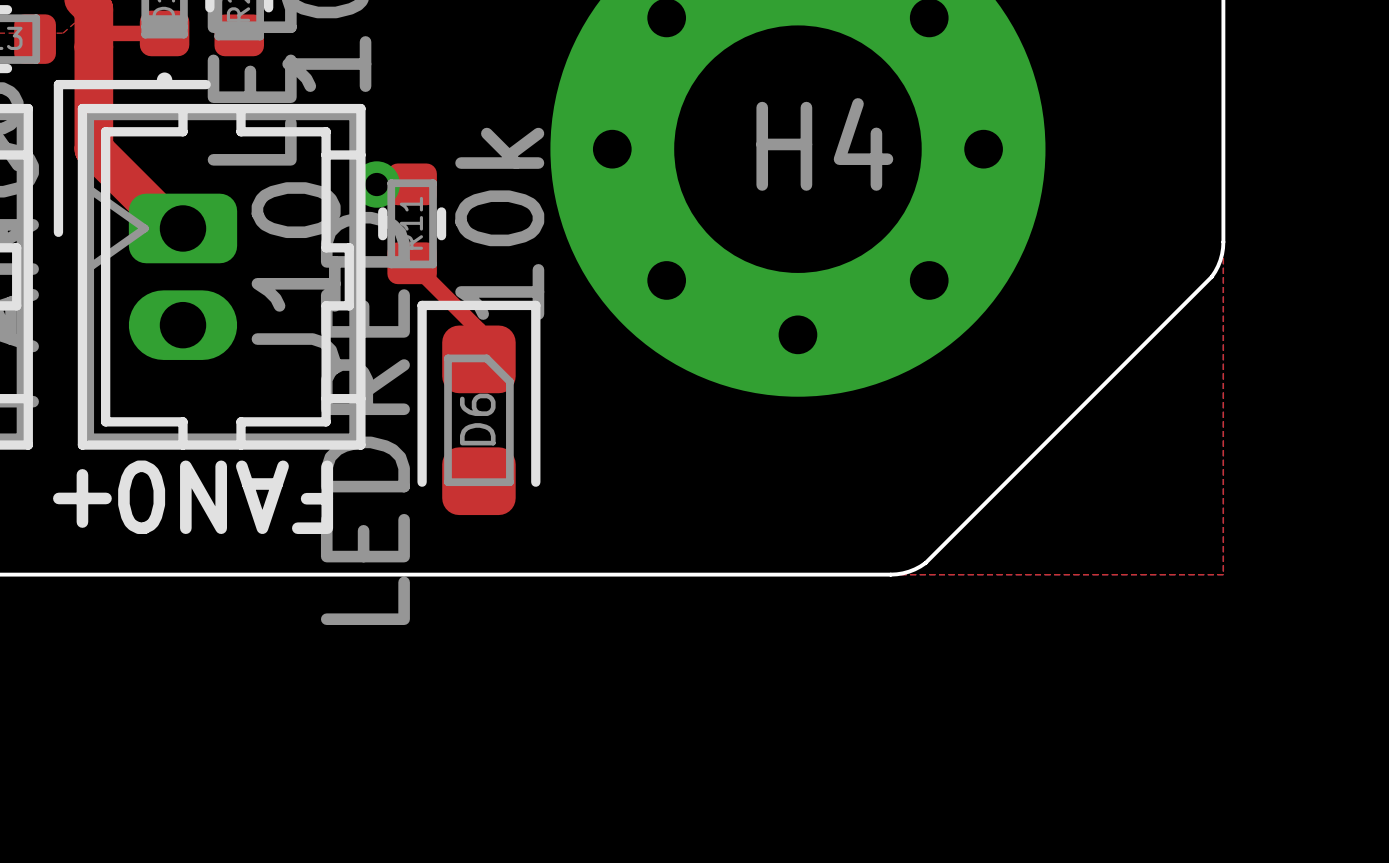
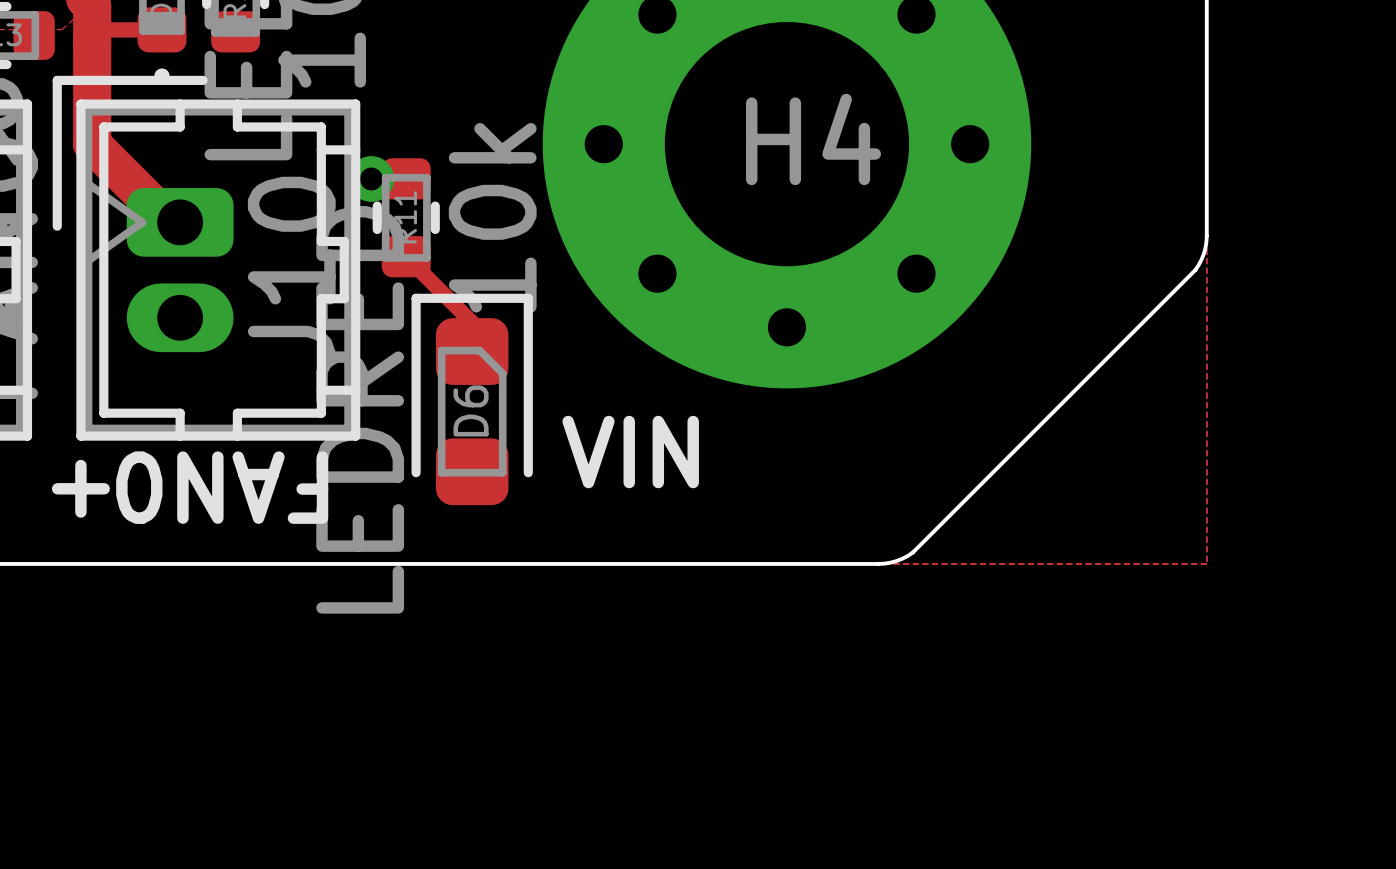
text: none -> VIN (630, 452)

